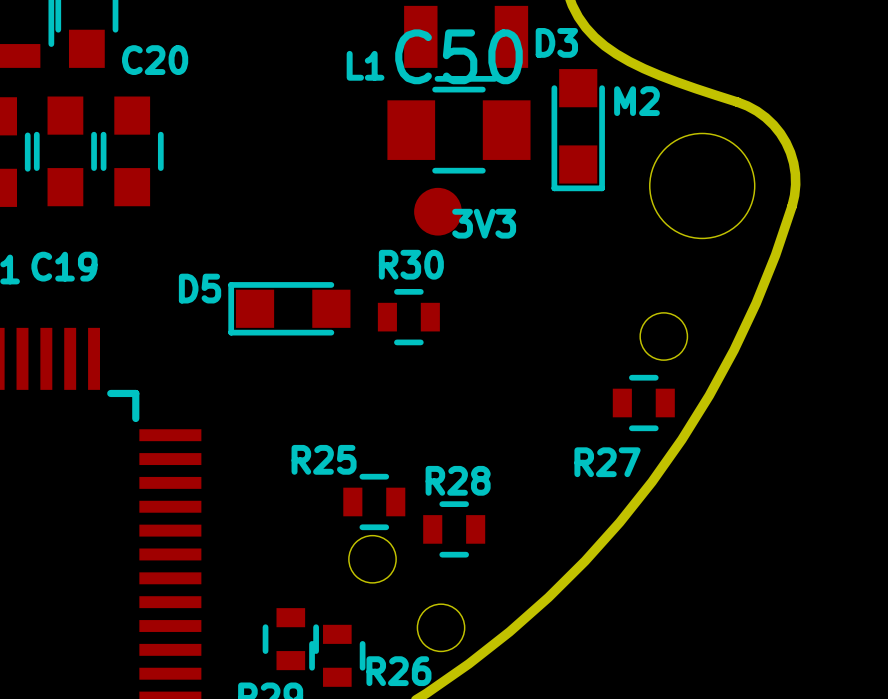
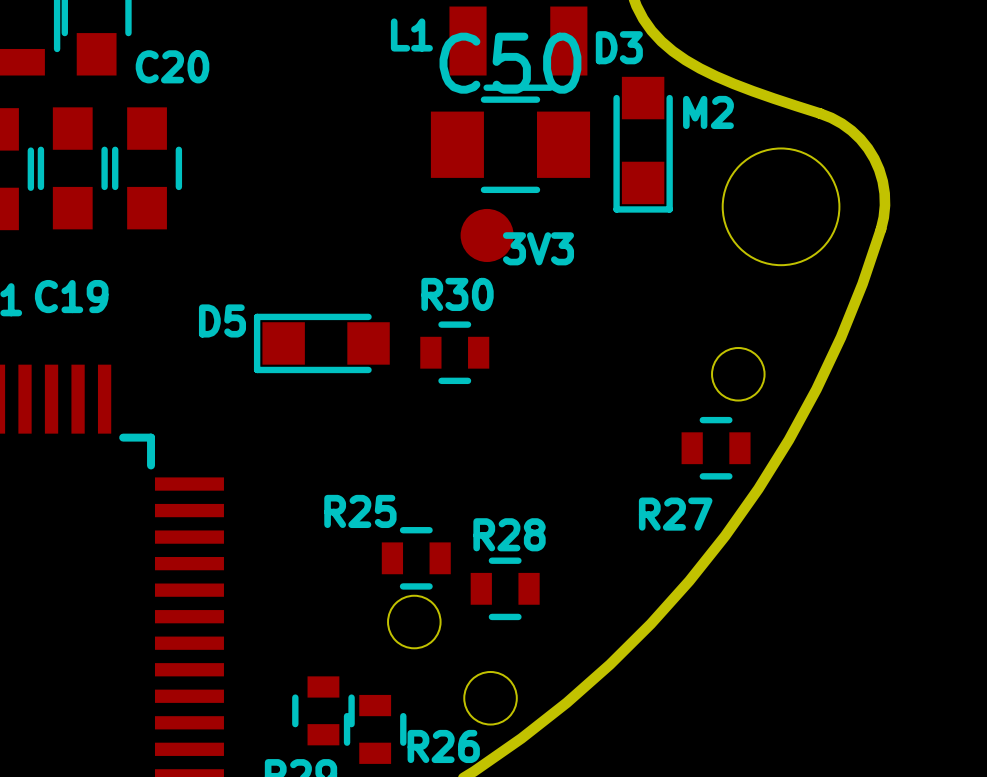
L1 name position: L1 (365, 65) -> L1 (411, 34)

